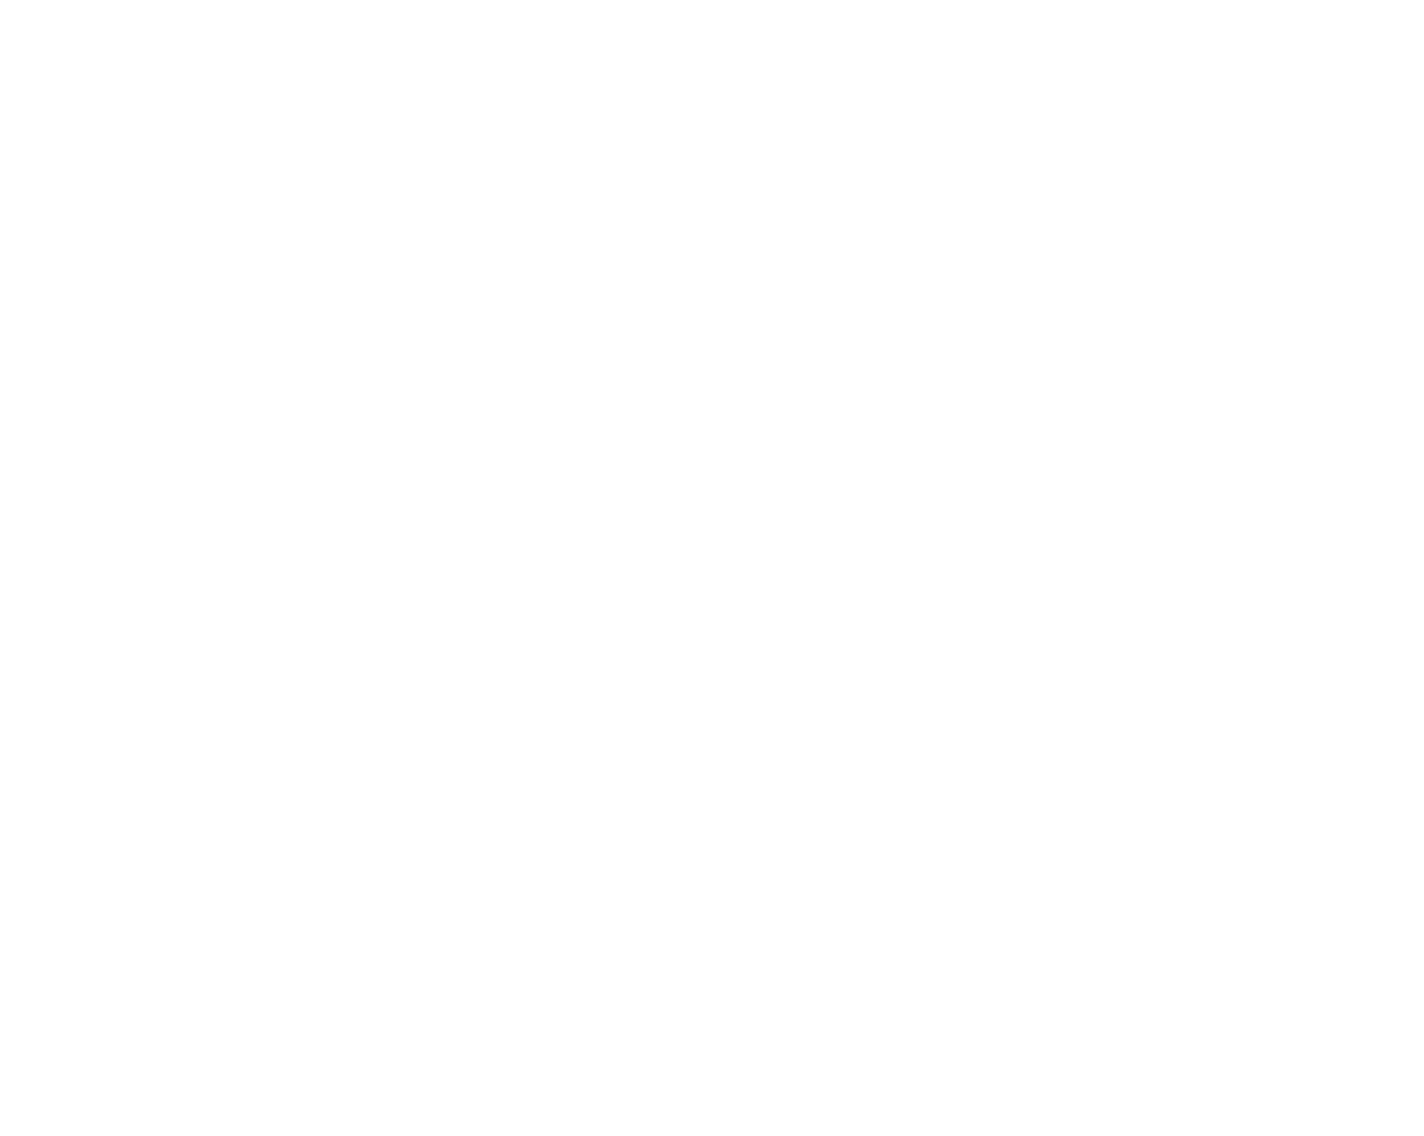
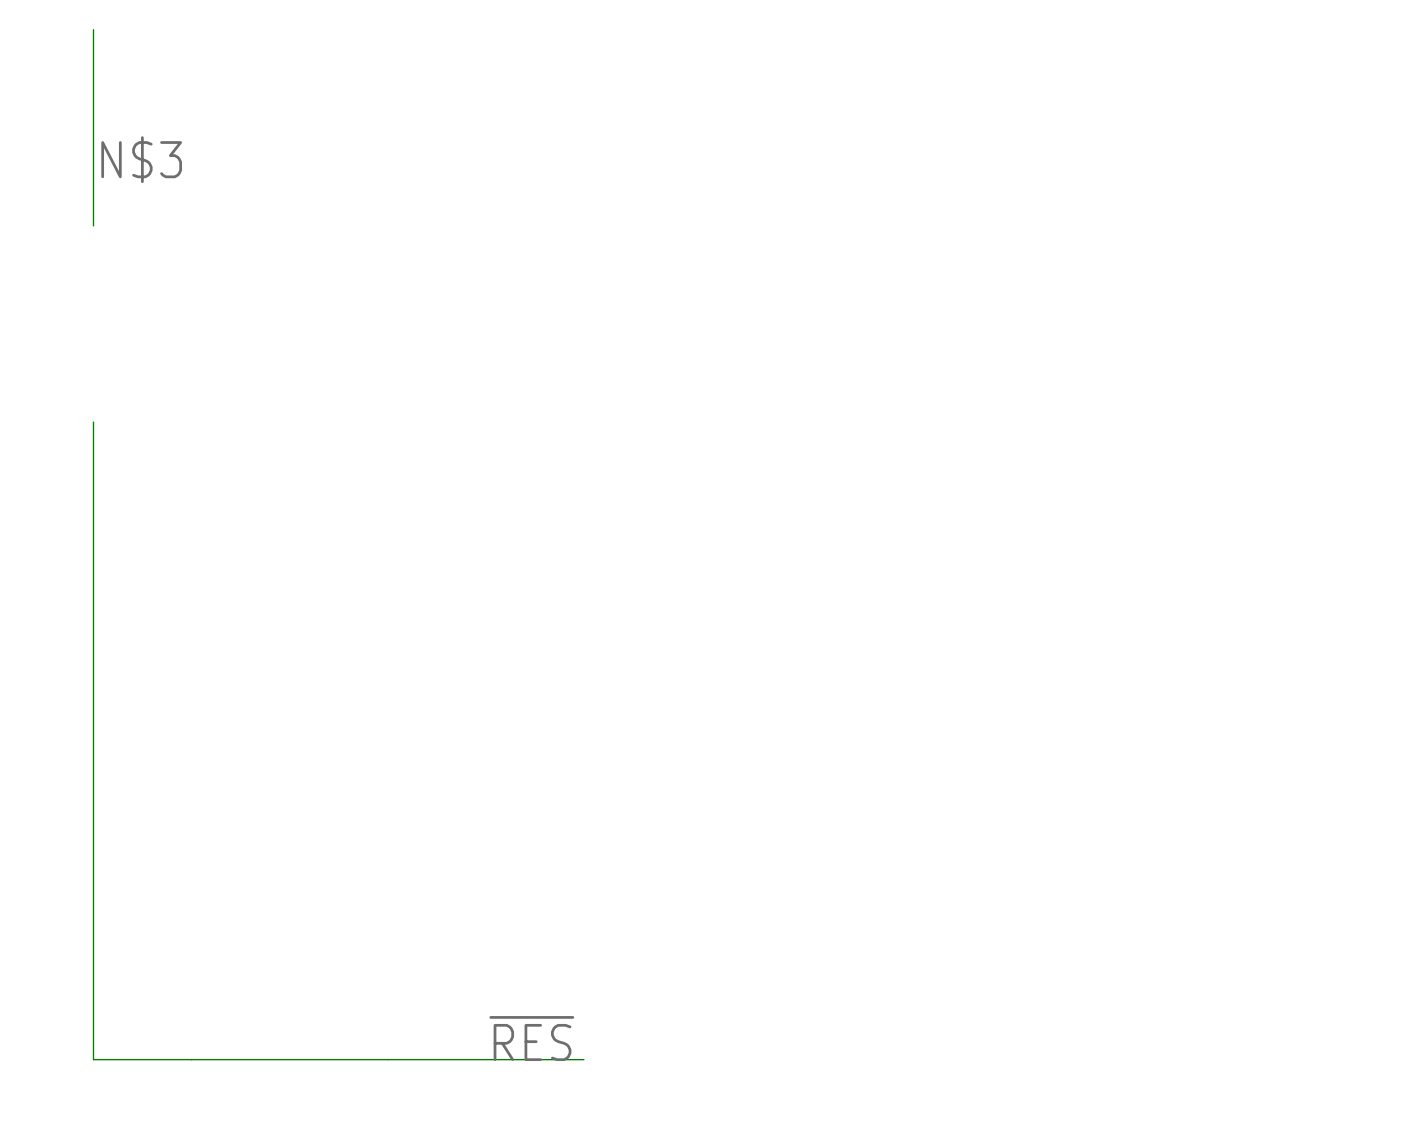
wire: none -> (93, 29) (93, 225)
label: none -> N$3 (141, 159)
wire: none -> (93, 422) (93, 1059) (583, 1059)
label: none -> ~{RES} (531, 1038)

